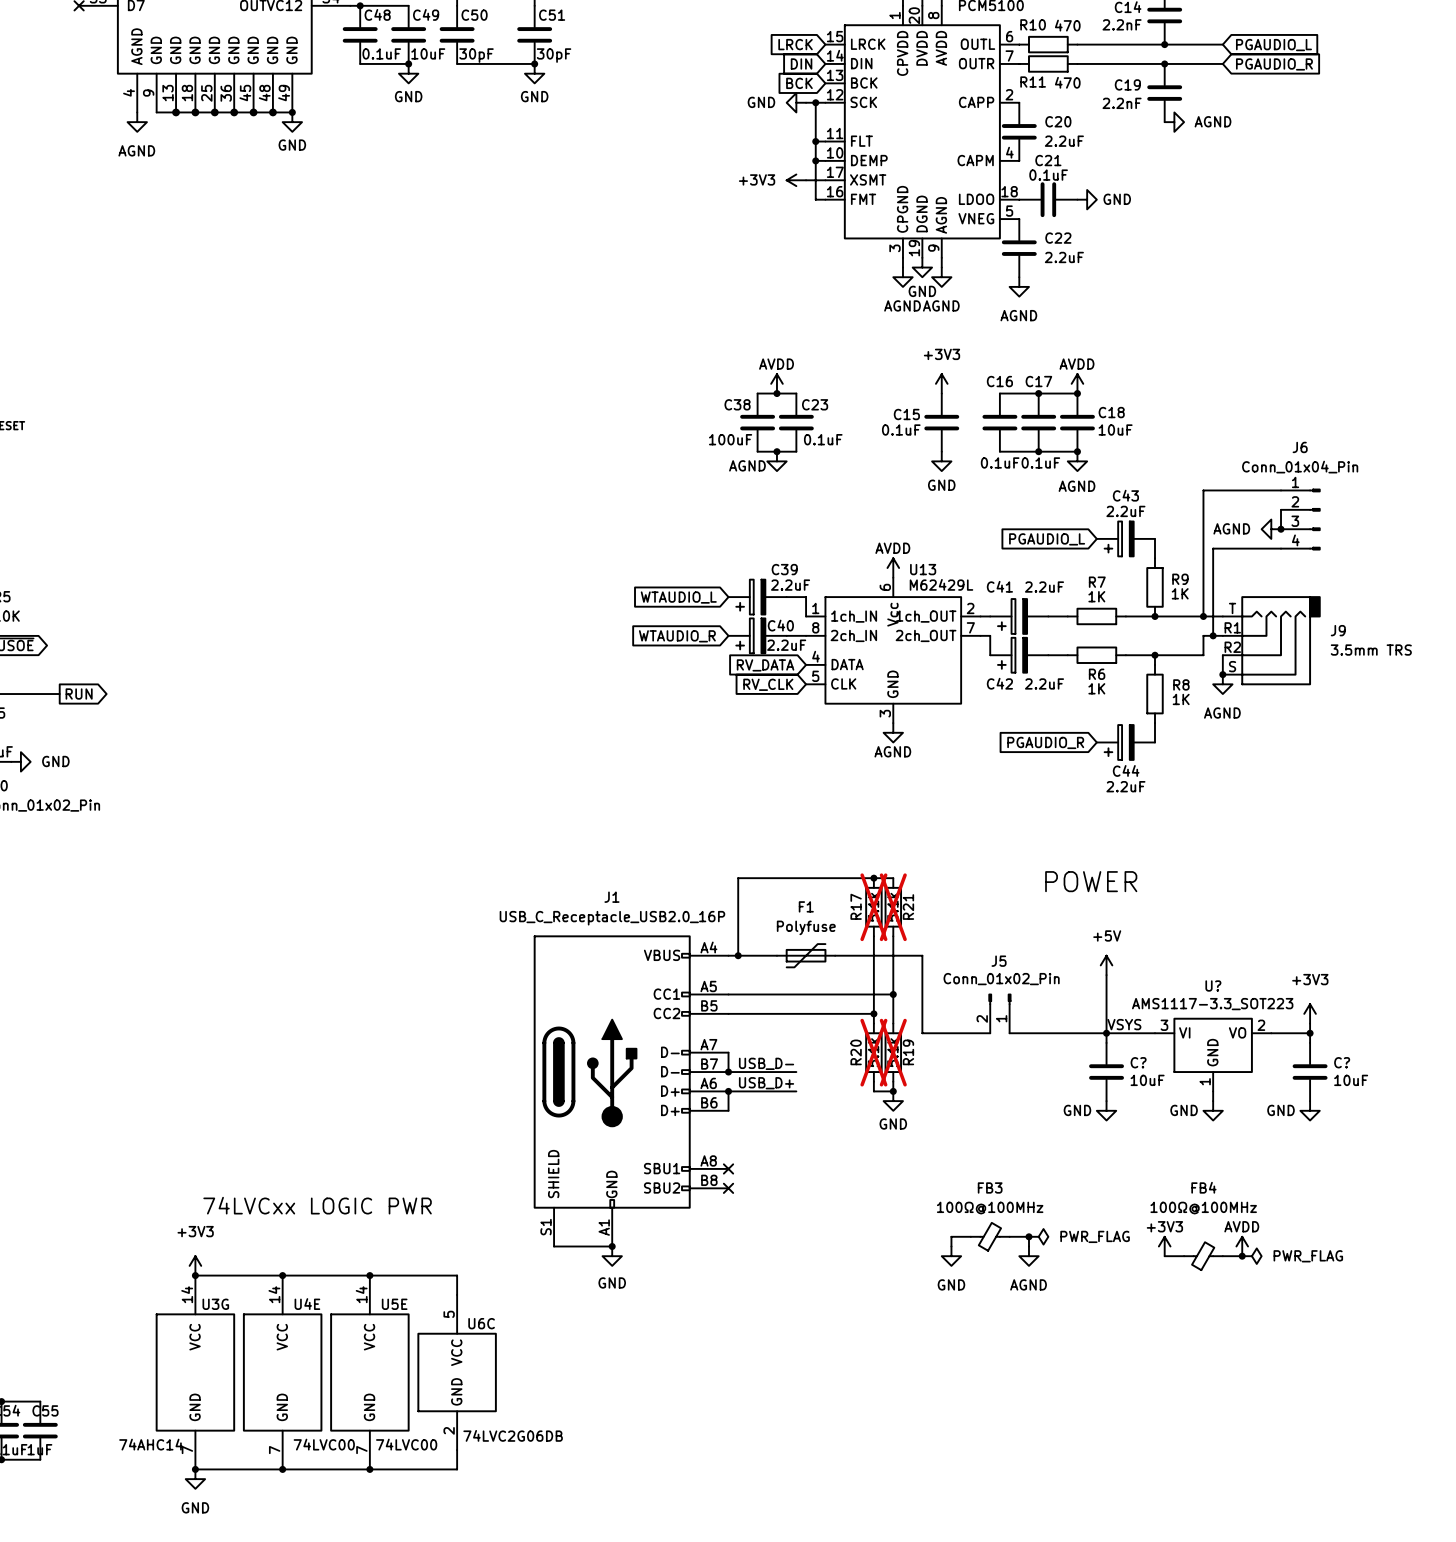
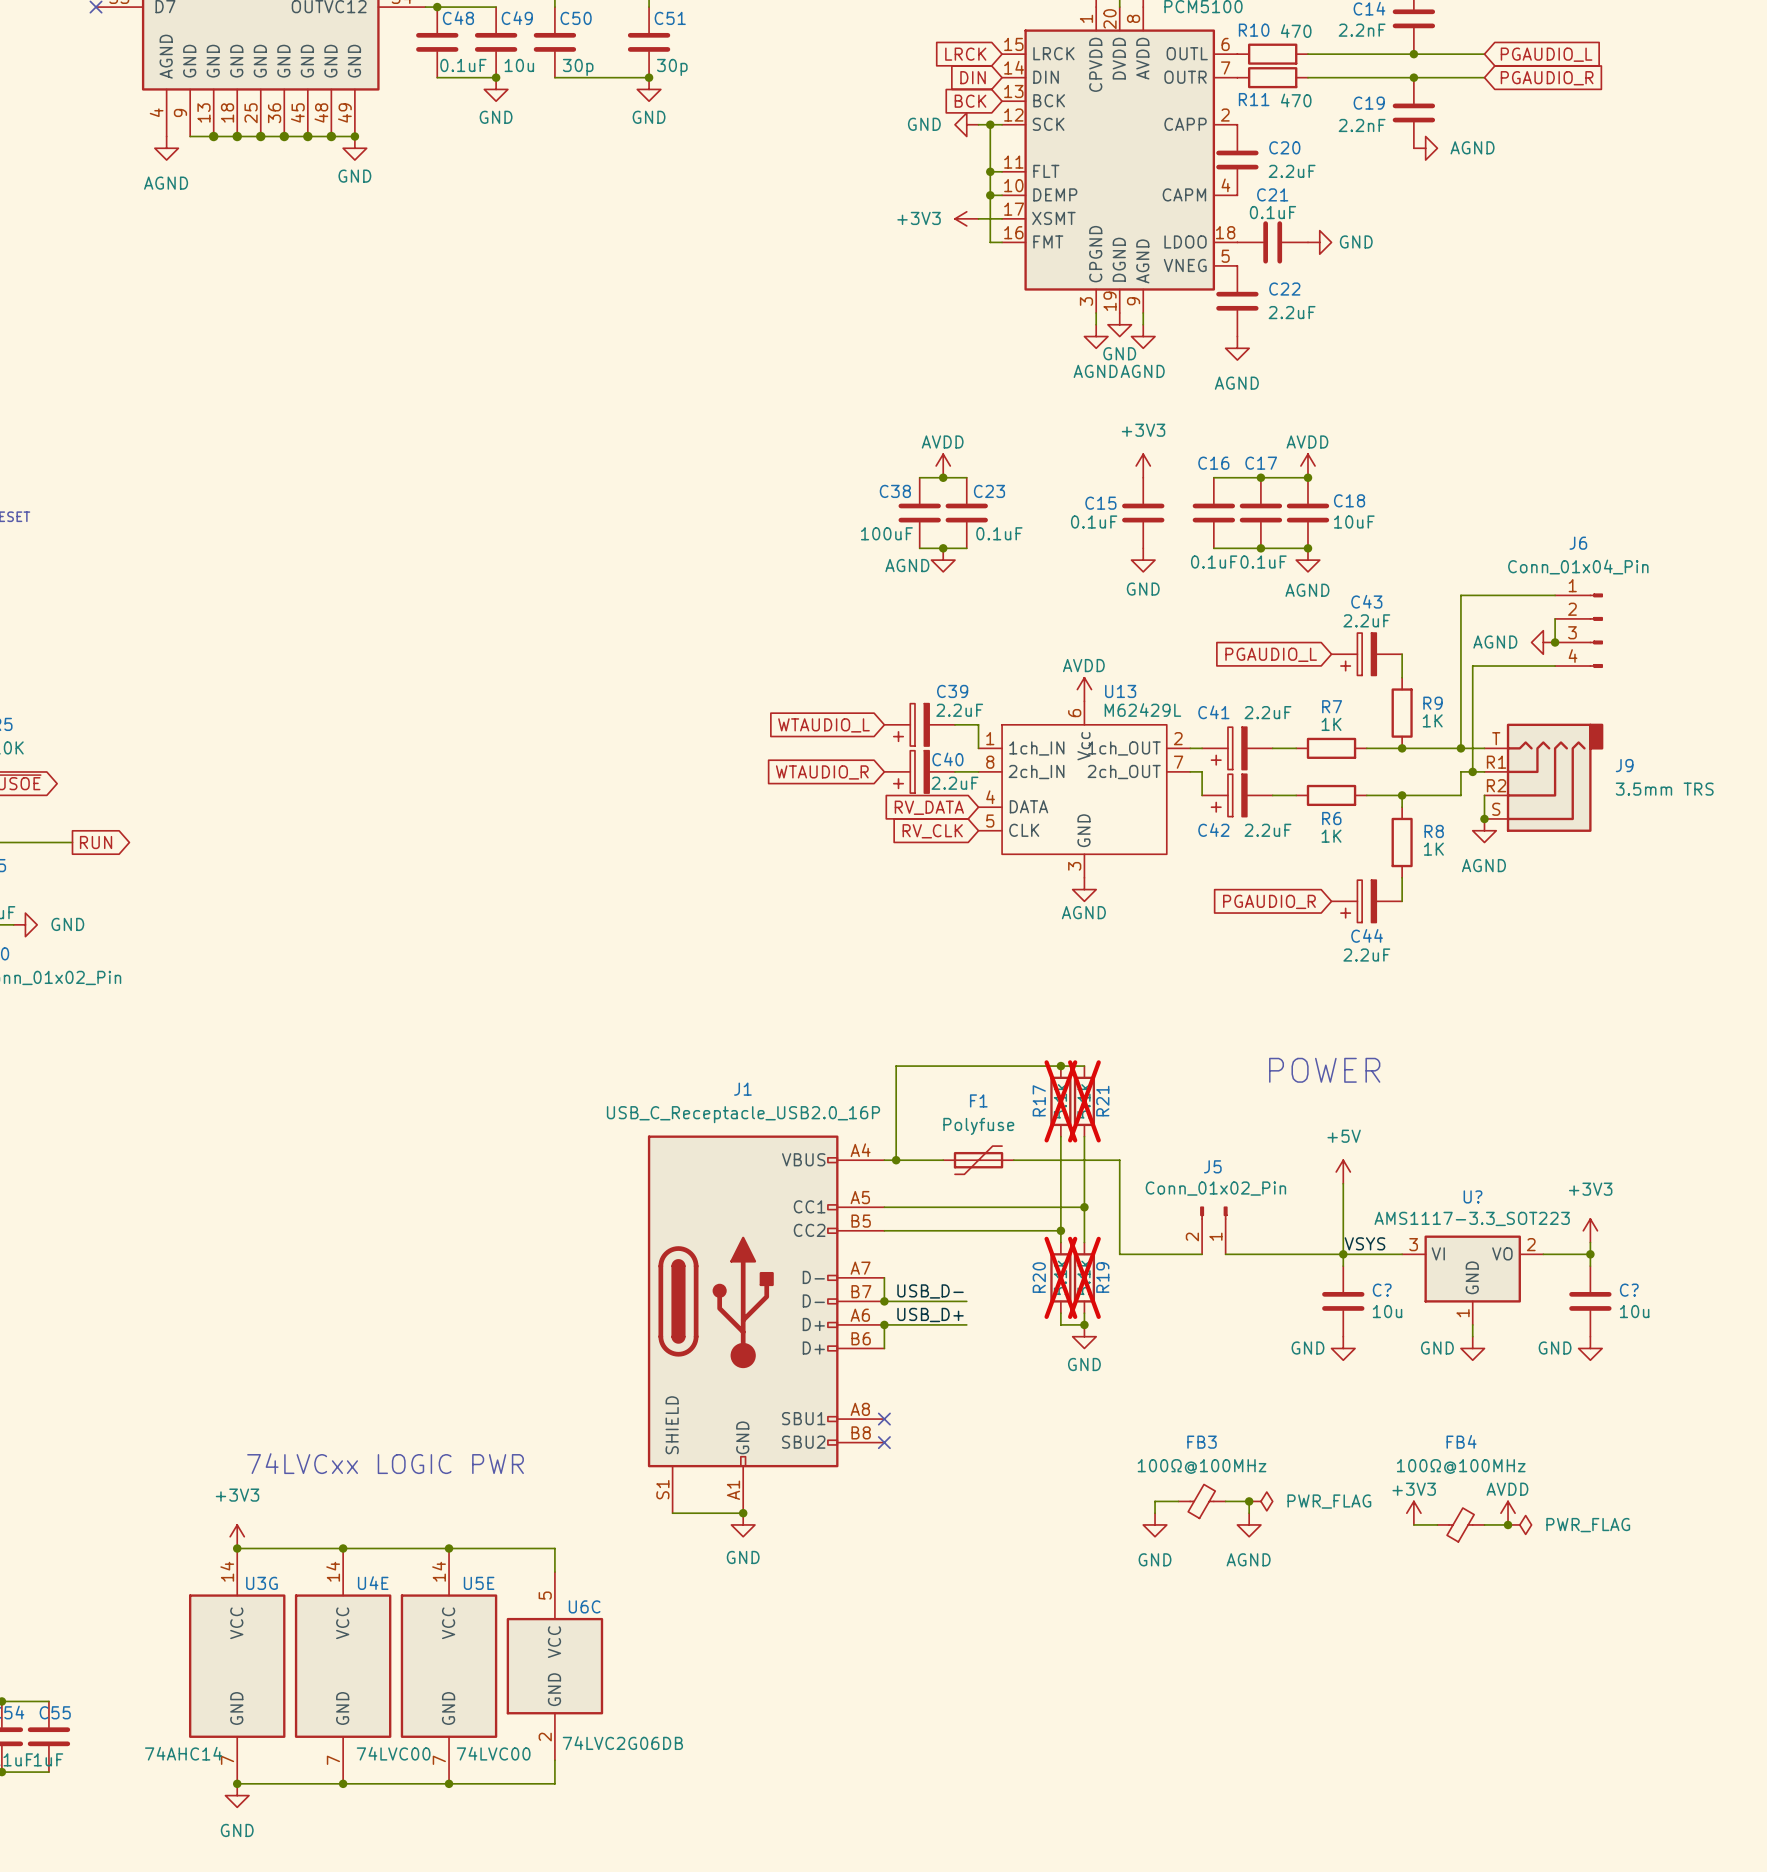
C49 value: 10uF (428, 53) -> 10u (519, 65)
C50 value: 30pF (476, 55) -> 30p (578, 67)
C51 value: 30pF (554, 55) -> 30p (672, 67)
C? value: 10uF (1147, 1080) -> 10u (1387, 1311)
C? value: 10uF (1351, 1080) -> 10u (1634, 1311)

